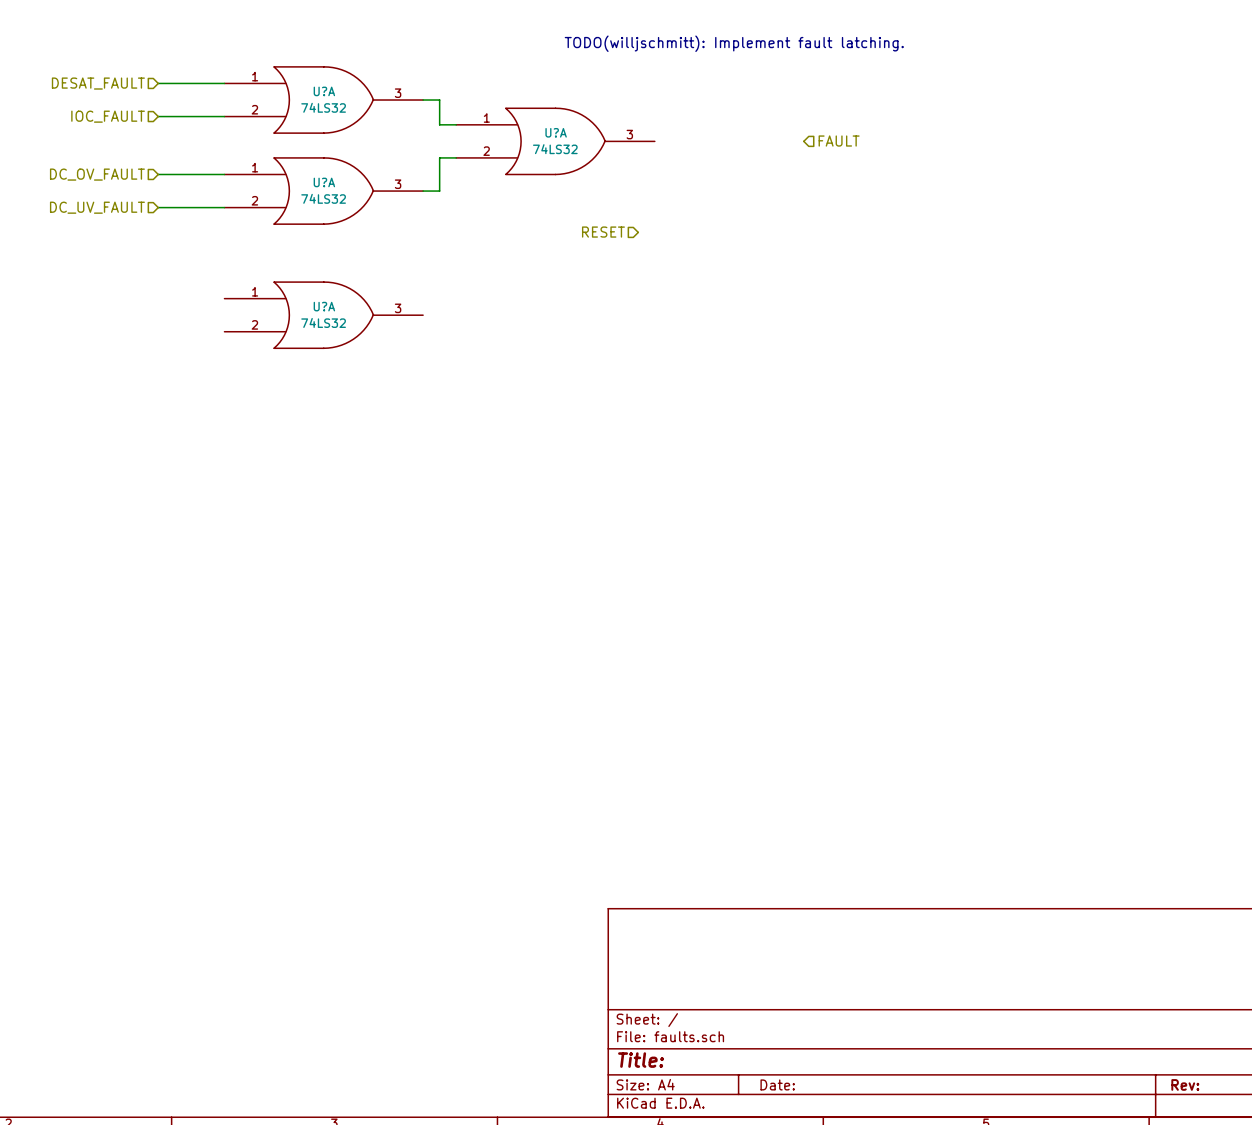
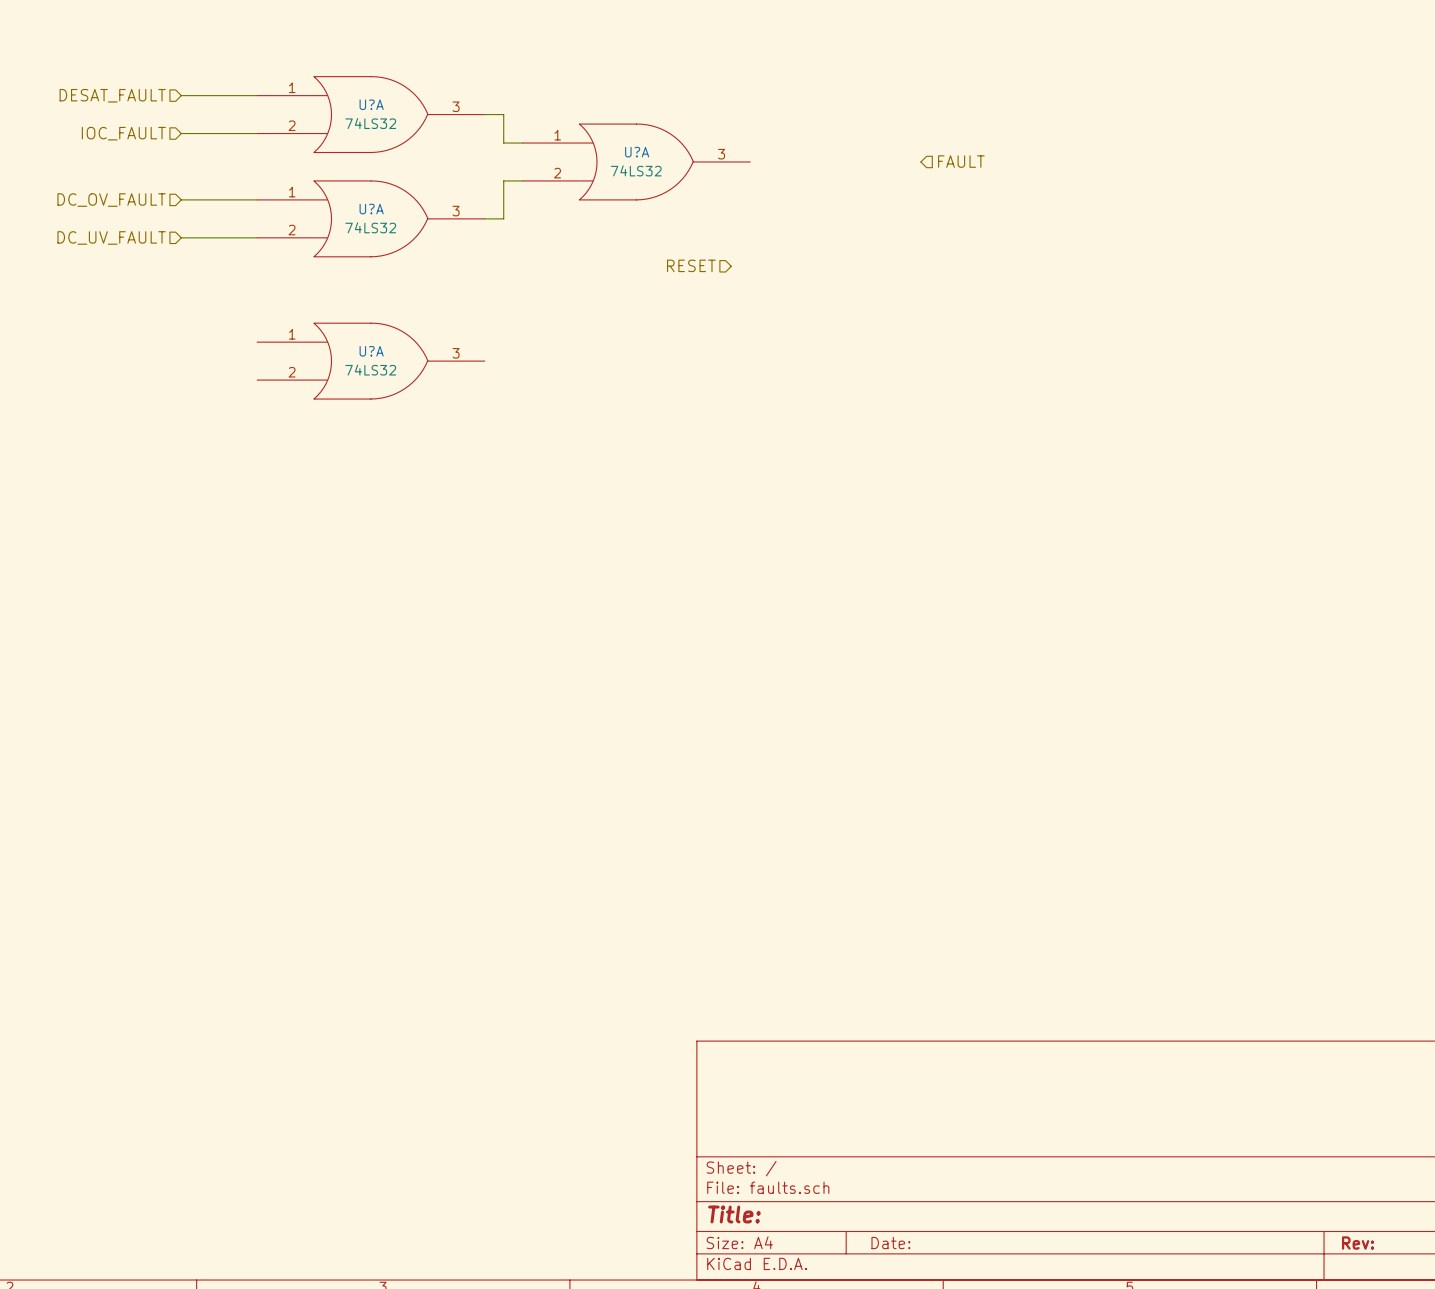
text: TODO(willjschmitt): Implement fault latching. (734, 43) -> none

